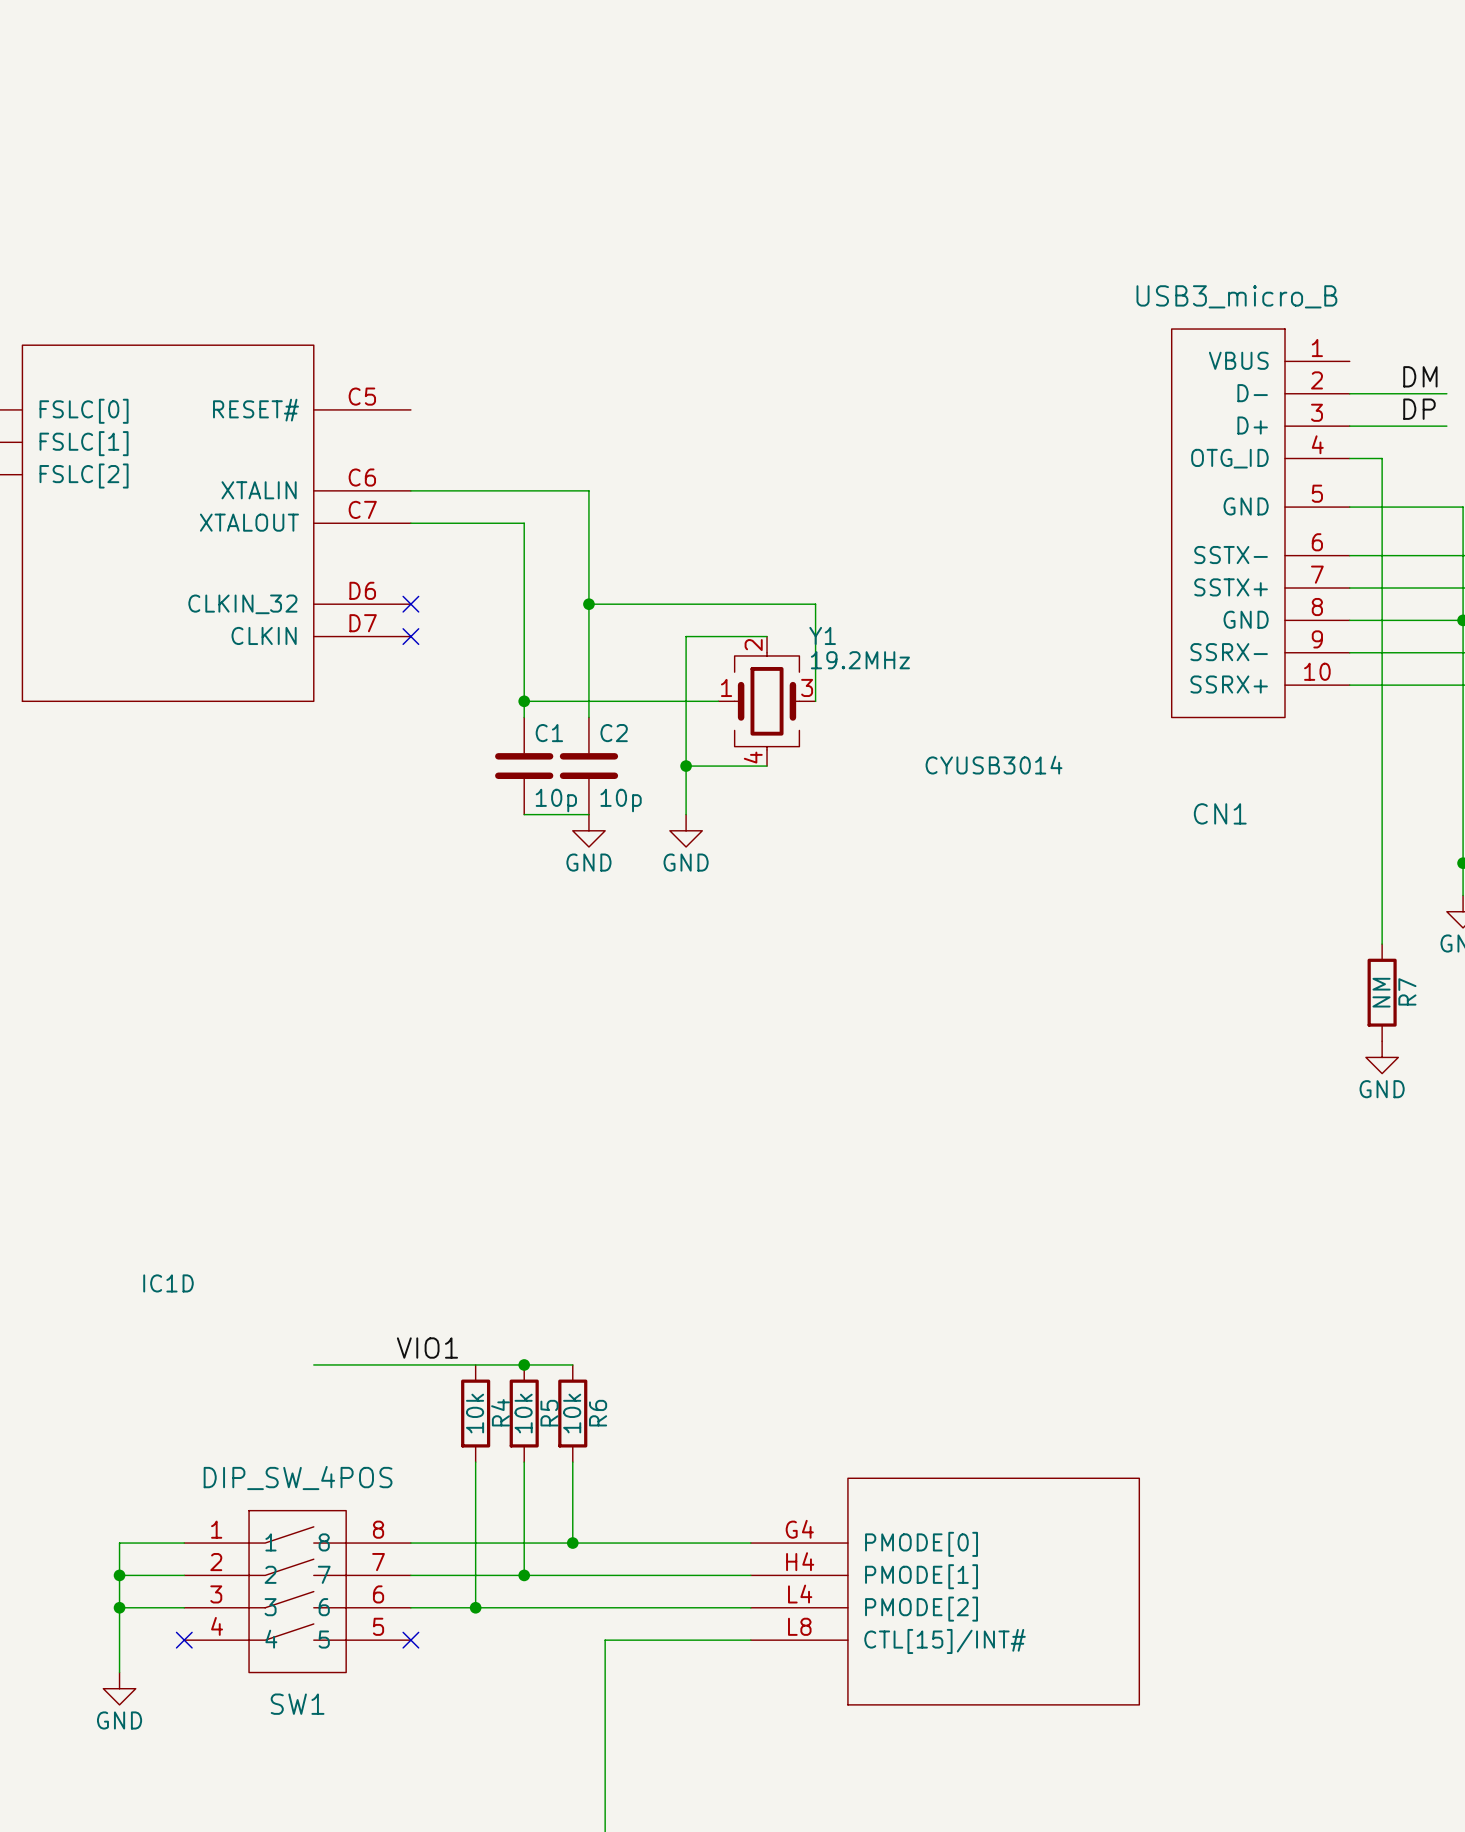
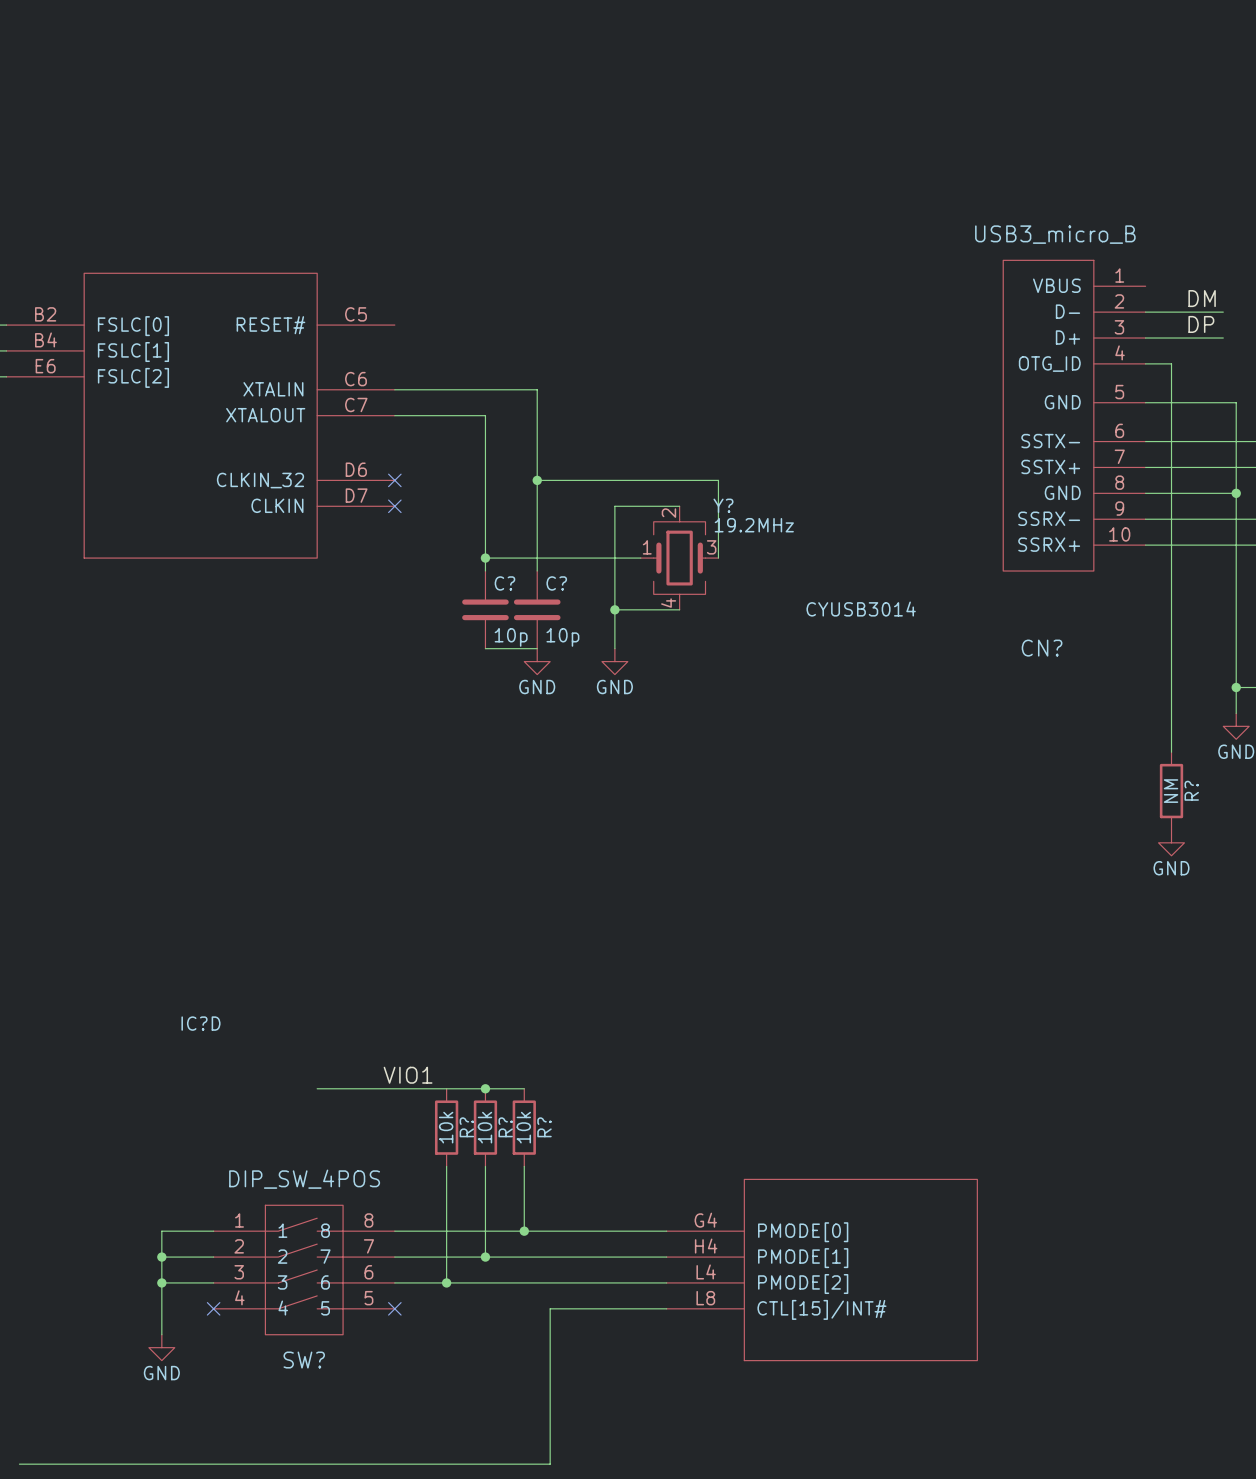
Y1 name: Y1 (822, 635) -> Y? (723, 505)
C1 name: C1 (549, 733) -> C? (504, 583)
C2 name: C2 (614, 733) -> C? (556, 583)
CN1 name: CN1 (1220, 813) -> CN? (1042, 648)
R7 name: R7 (1407, 991) -> R? (1191, 790)
IC1D name: IC1D (168, 1283) -> IC?D (200, 1023)
R4 name: R4 (500, 1412) -> R? (466, 1127)
R5 name: R5 (549, 1413) -> R? (505, 1127)
R6 name: R6 (598, 1413) -> R? (544, 1127)
SW1 name: SW1 (297, 1704) -> SW? (304, 1360)

